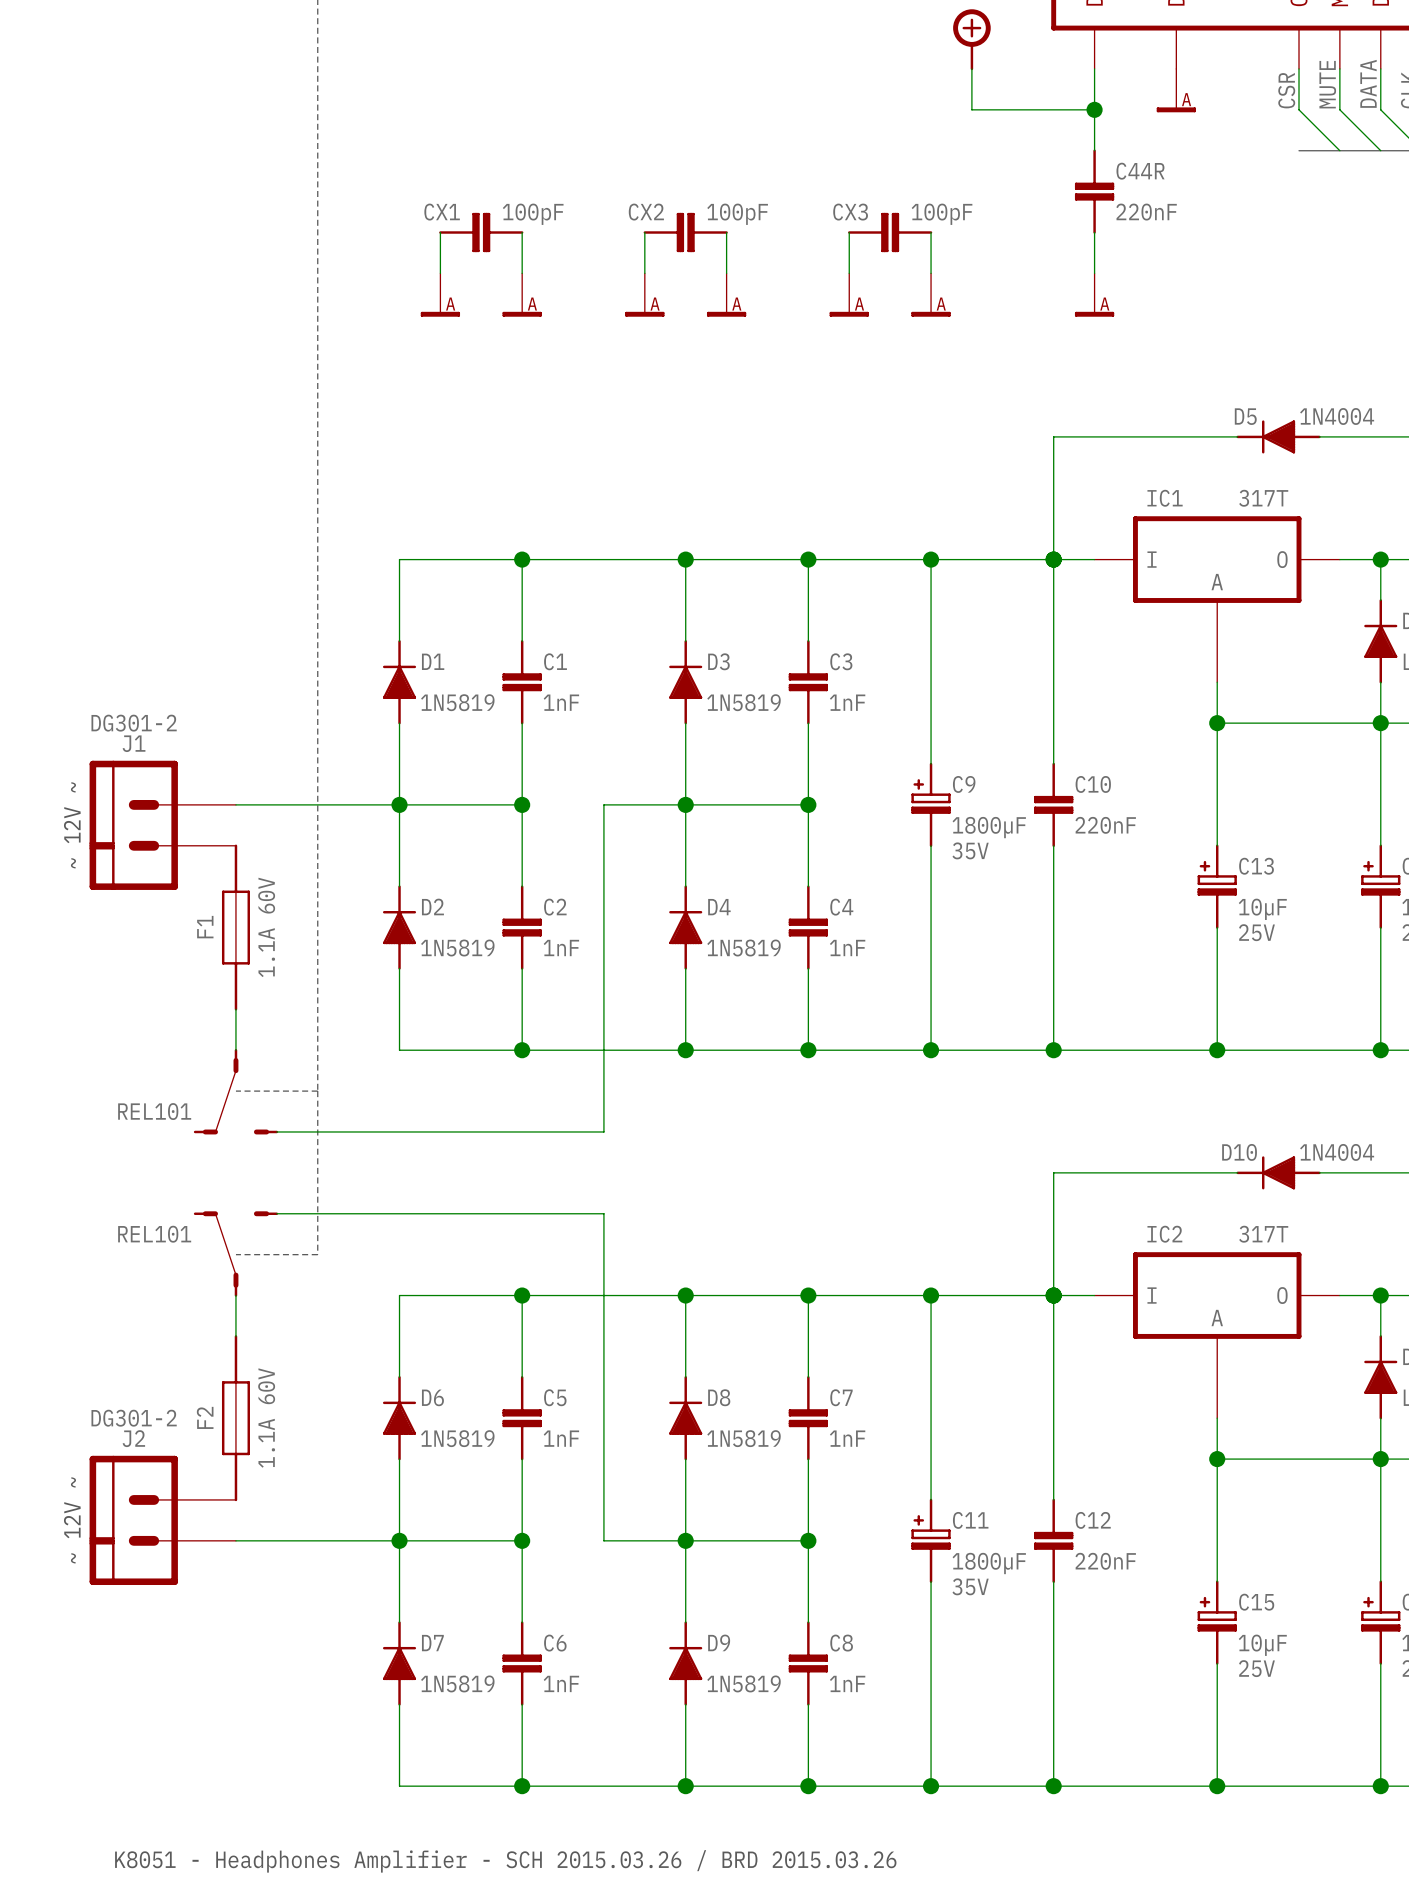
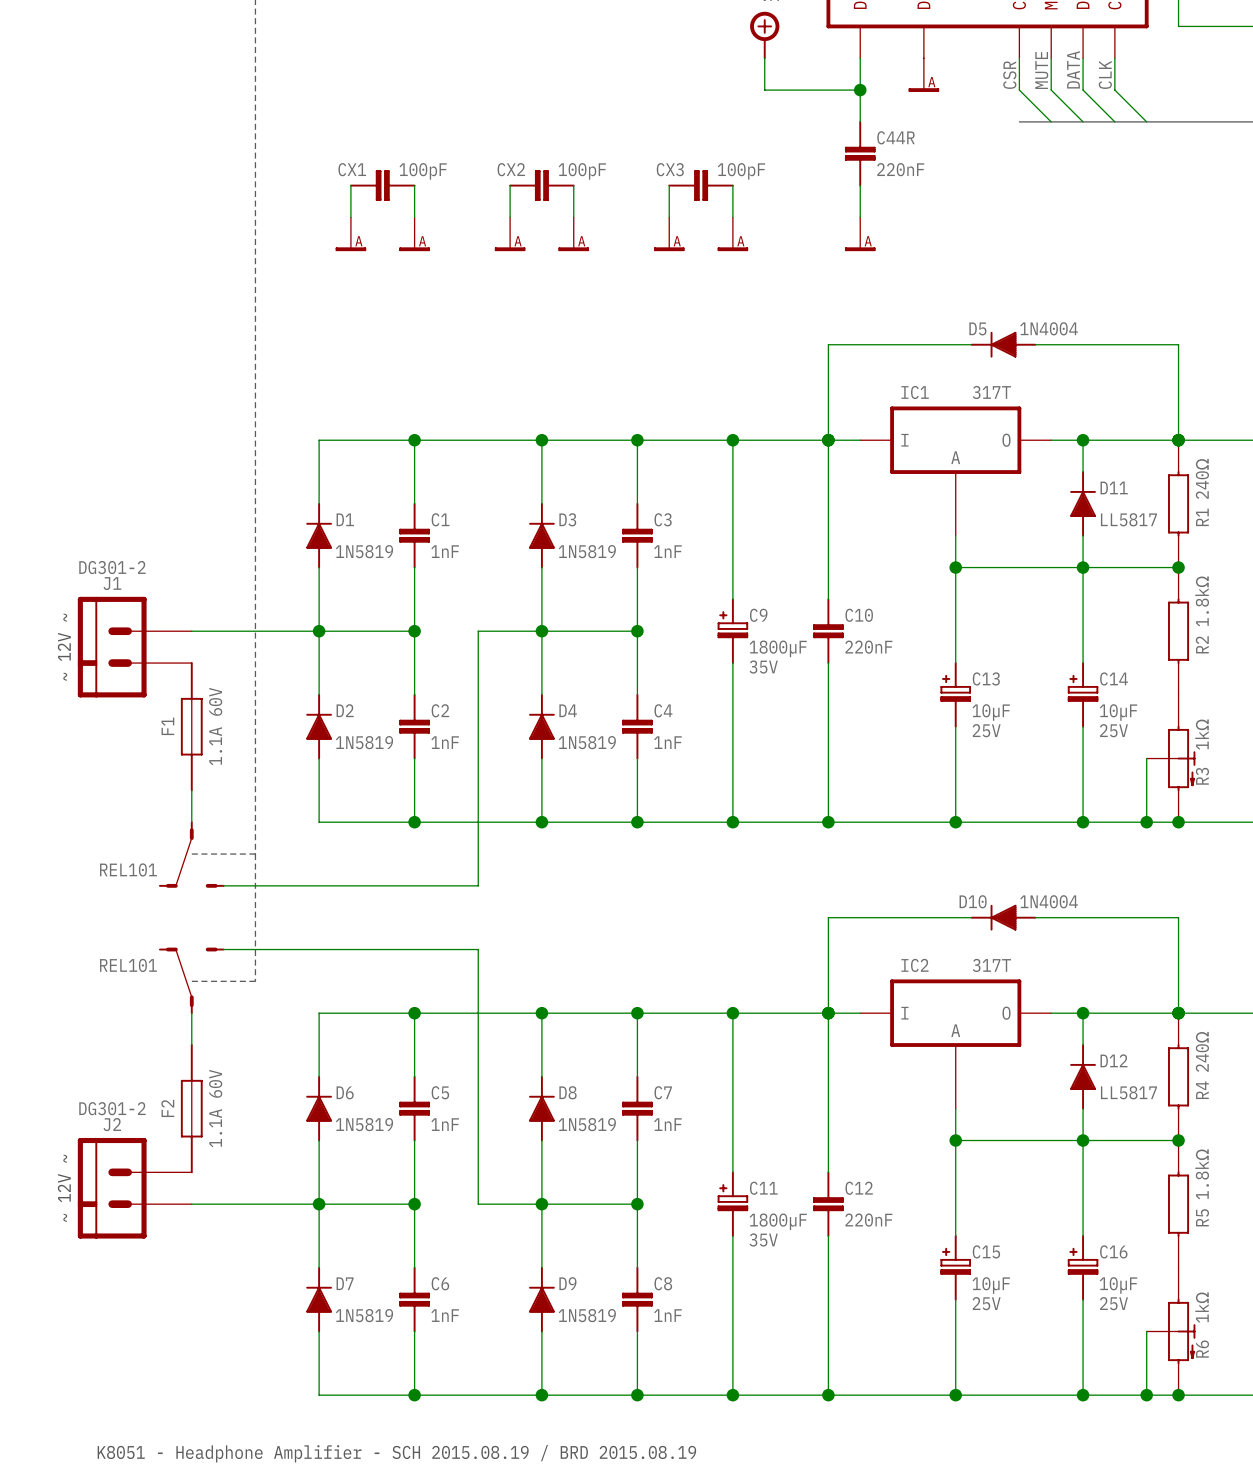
text: K8051 - Headphones Amplifier - SCH 2015.03.26 / BRD 2015.03.26 (505, 1861) -> K8051 - Headphone Amplifier - SCH 2015.08.19 / BRD 2015.08.19 (396, 1453)

